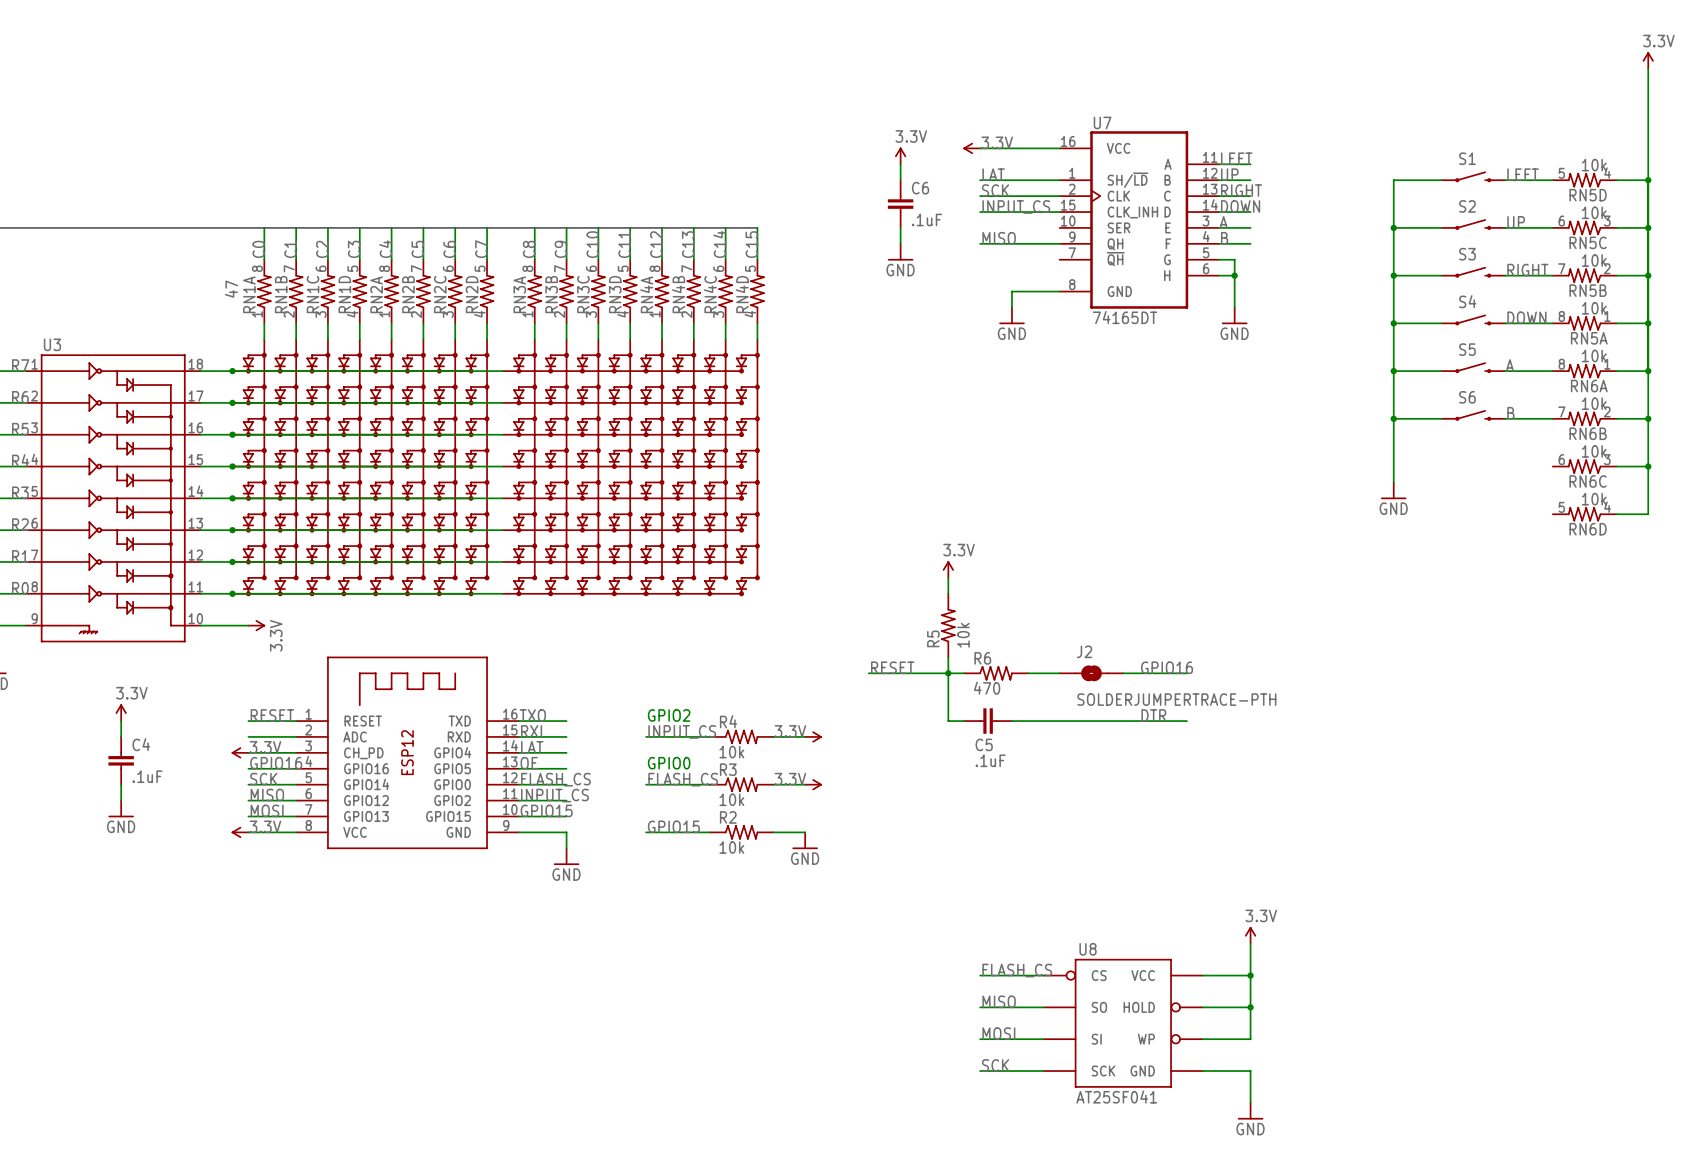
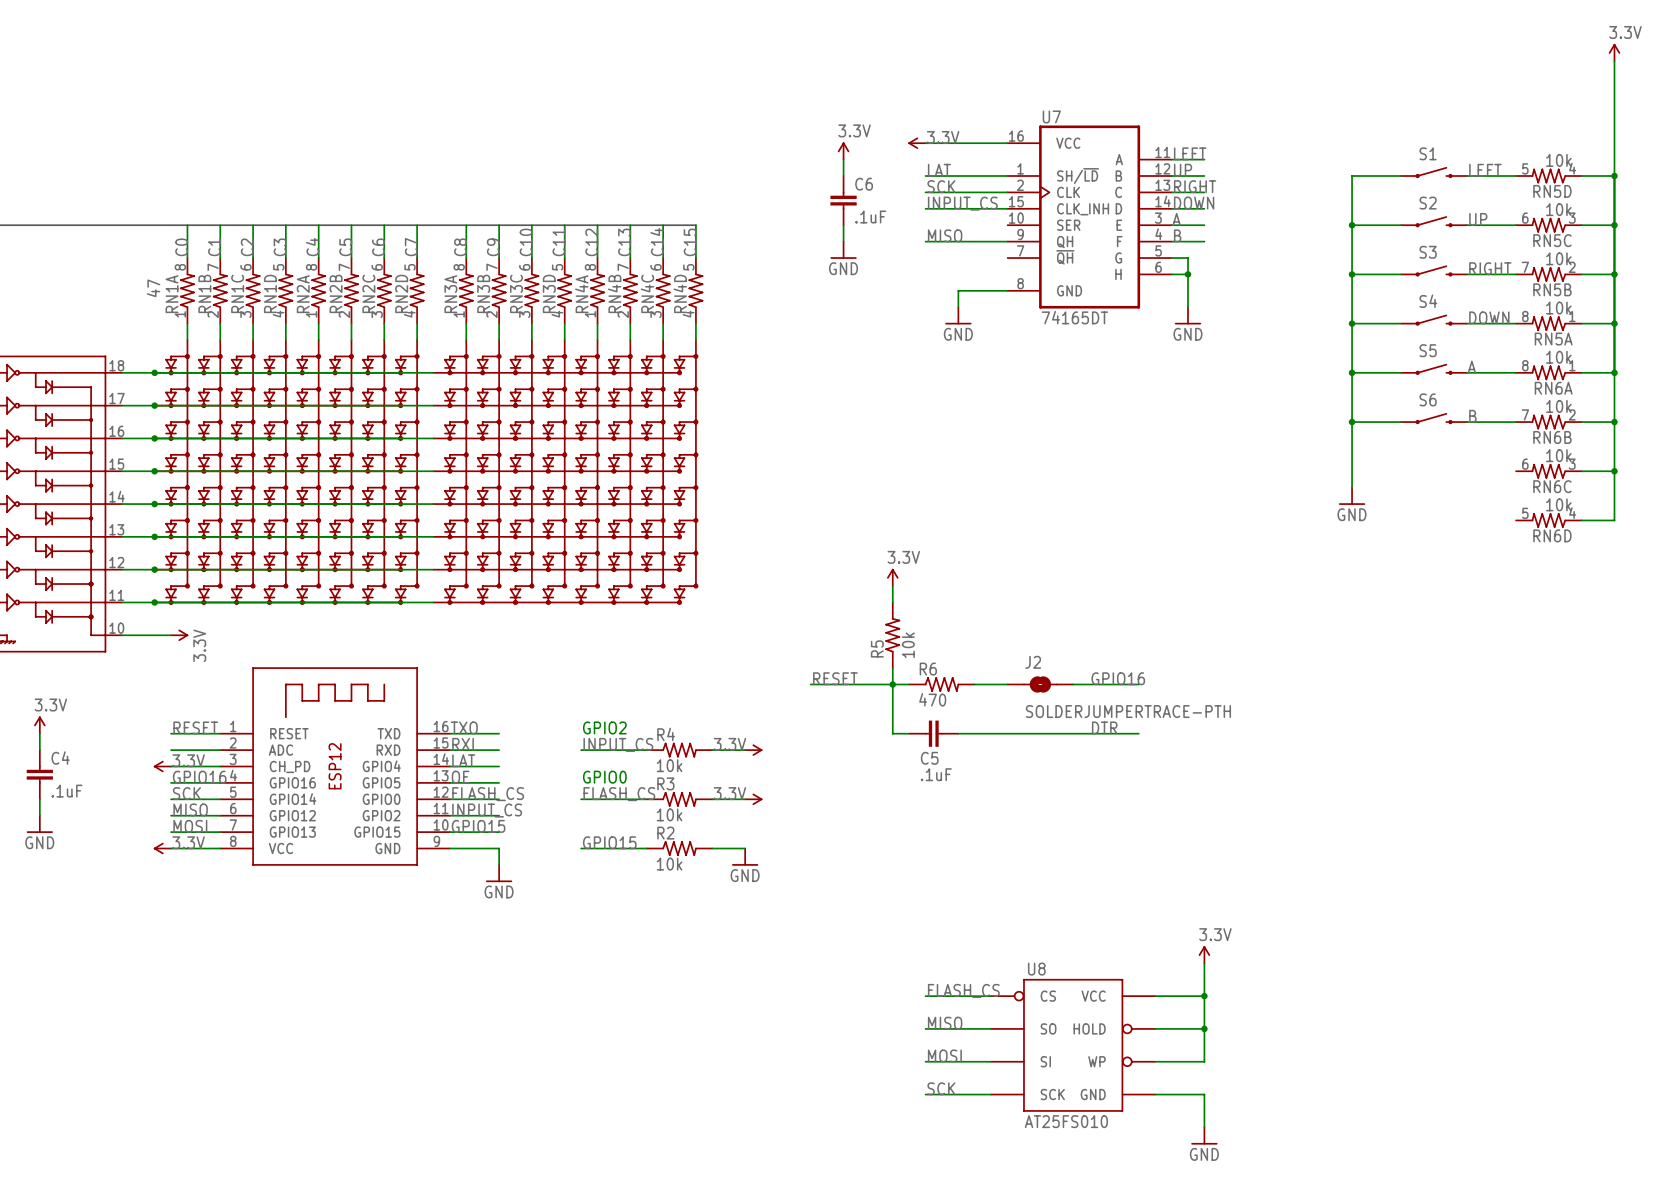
U8 value: AT25SF041 (1116, 1096) -> AT25FS010 (1066, 1121)

